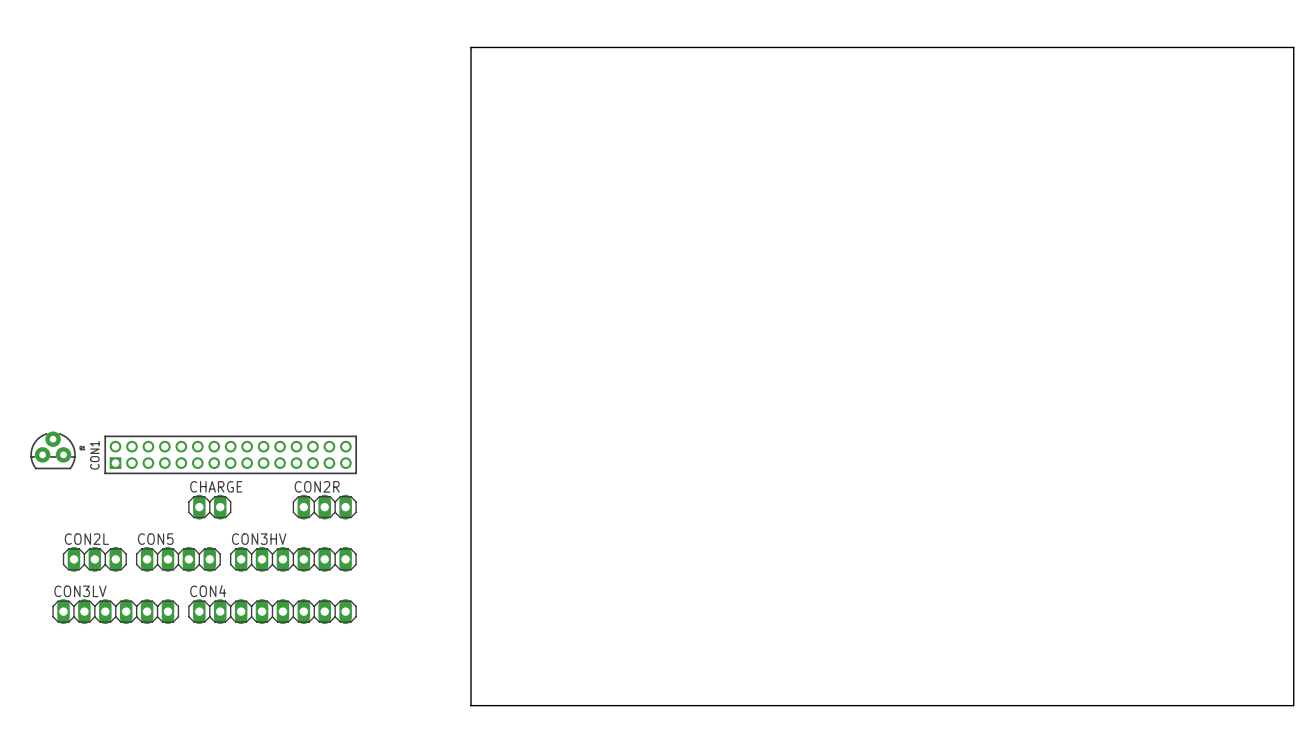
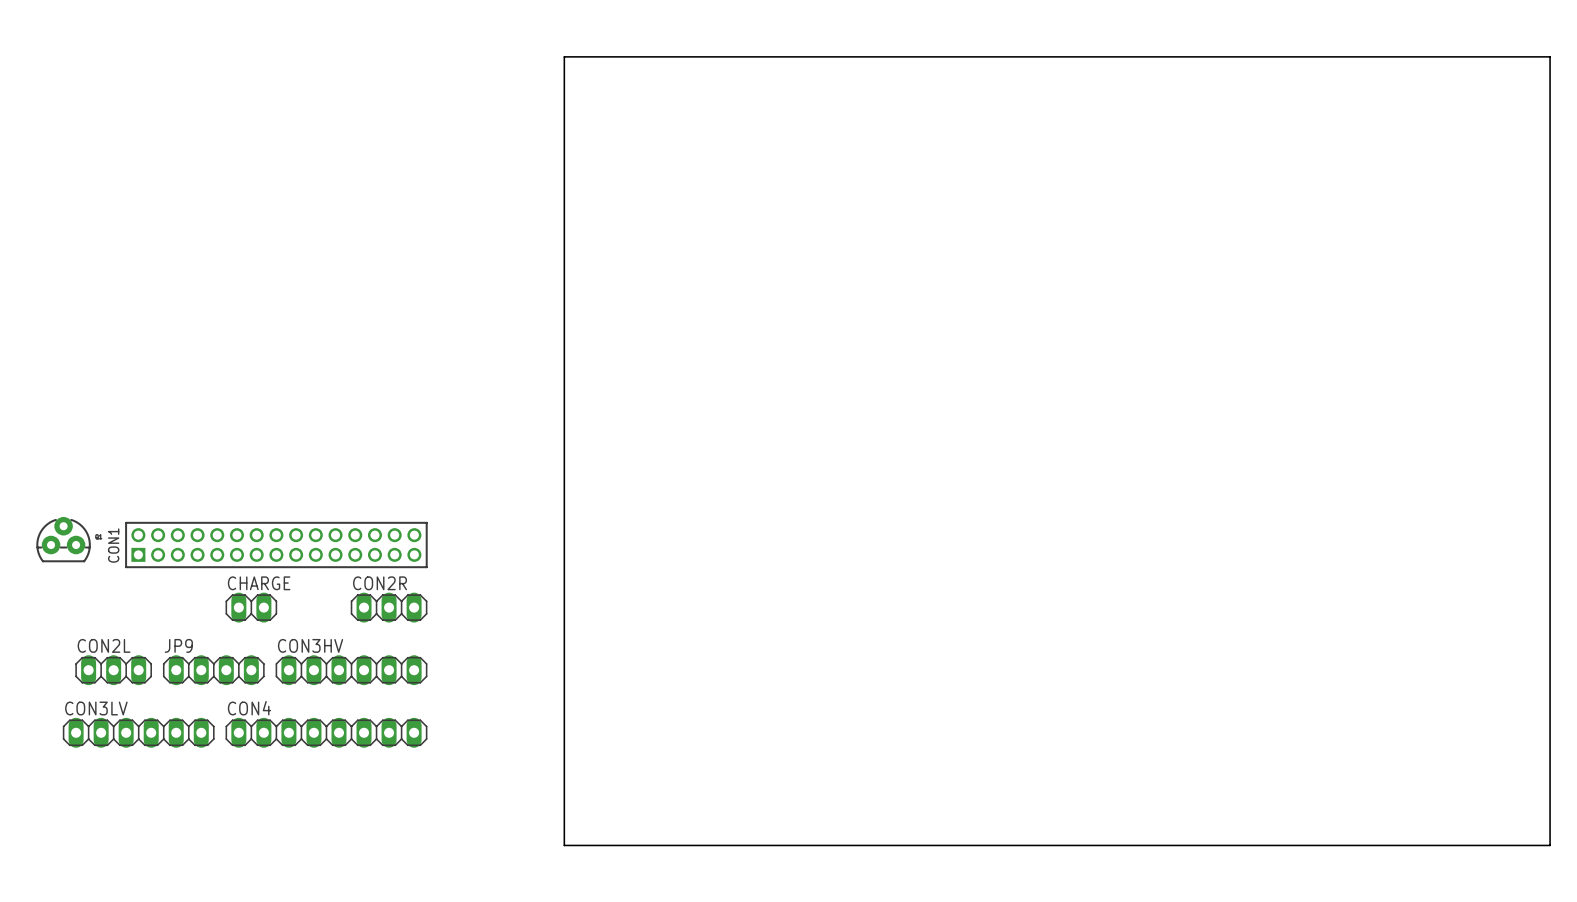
CON5 name: CON5 (155, 539) -> JP9 (178, 645)

